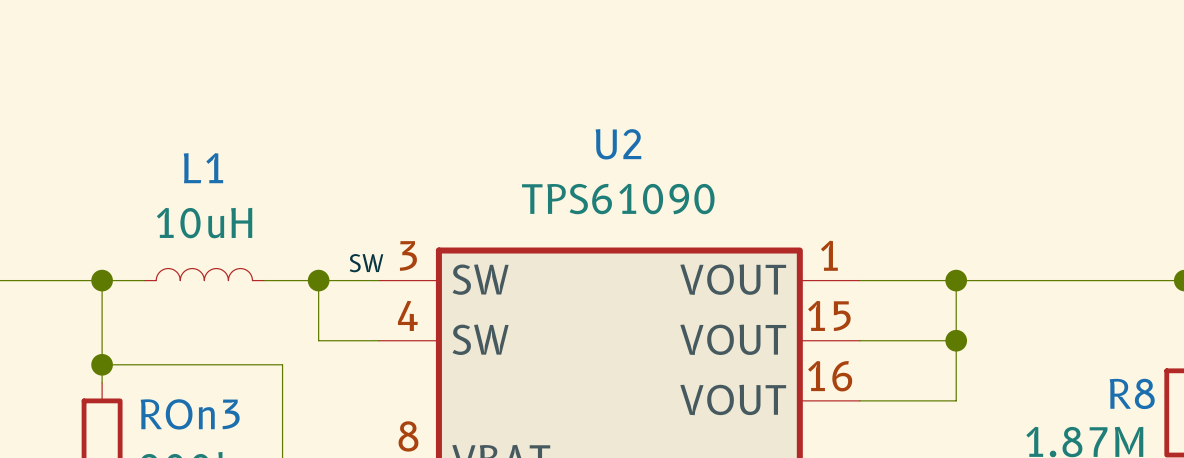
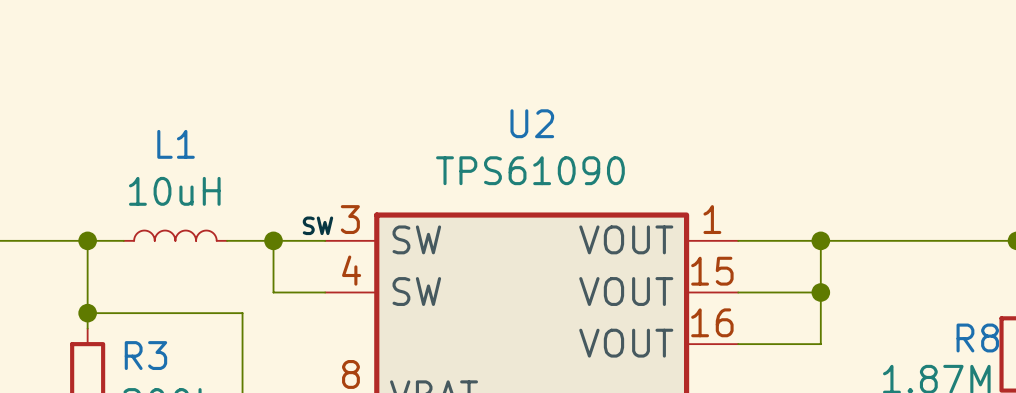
ROn3 name: ROn3 (190, 414) -> R3 (145, 355)

